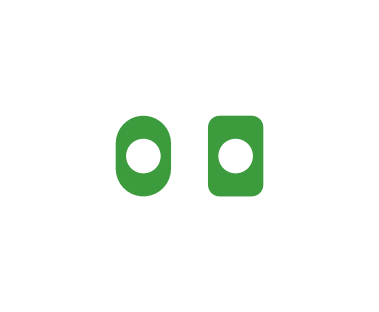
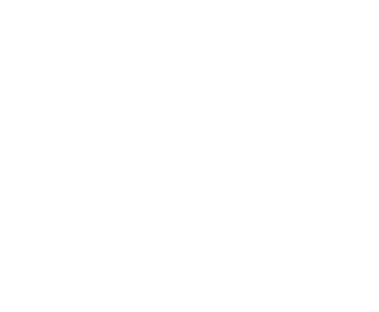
part: (189, 156) -> none

